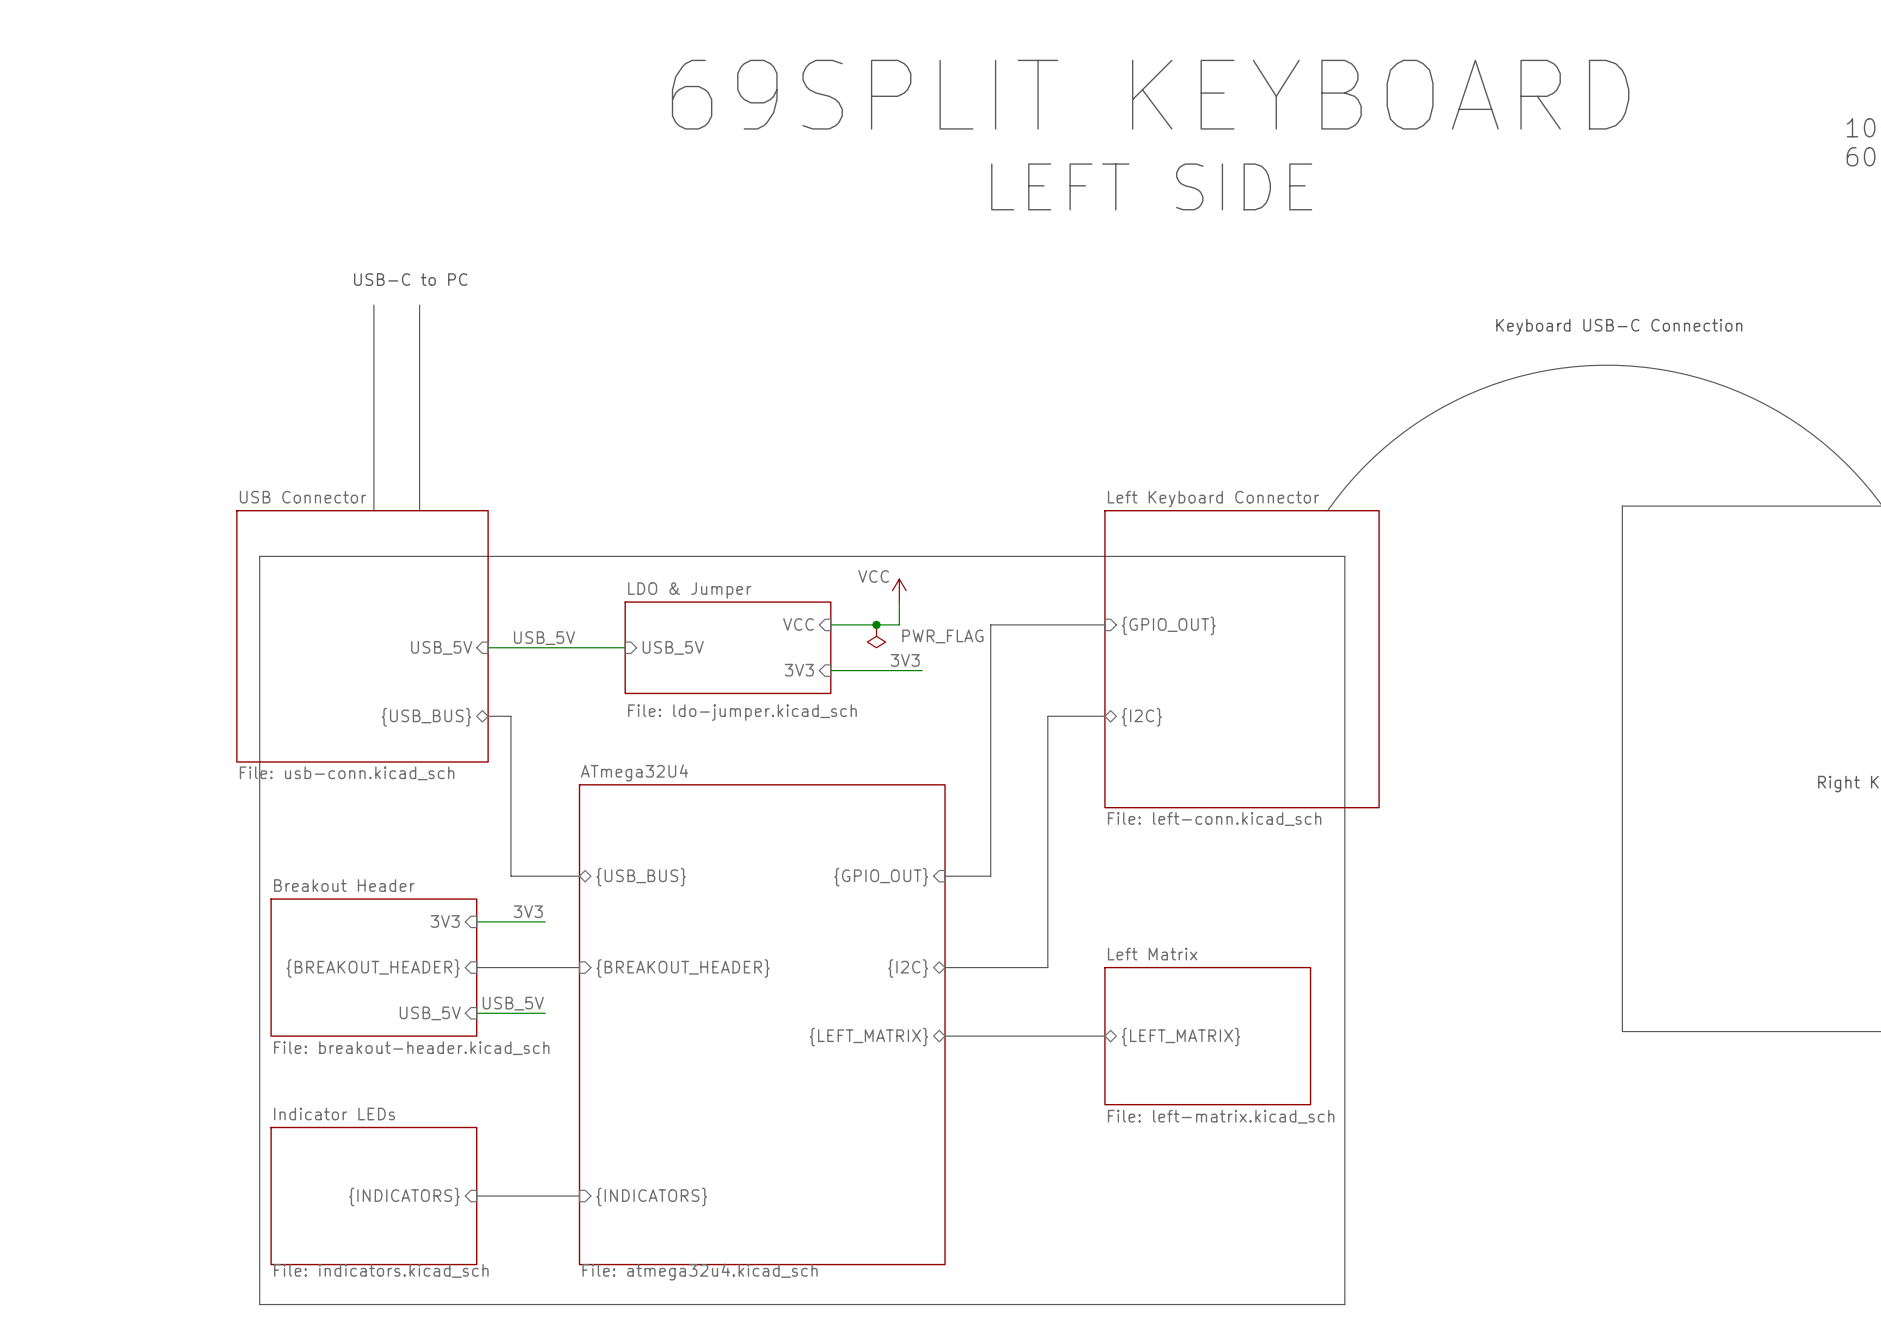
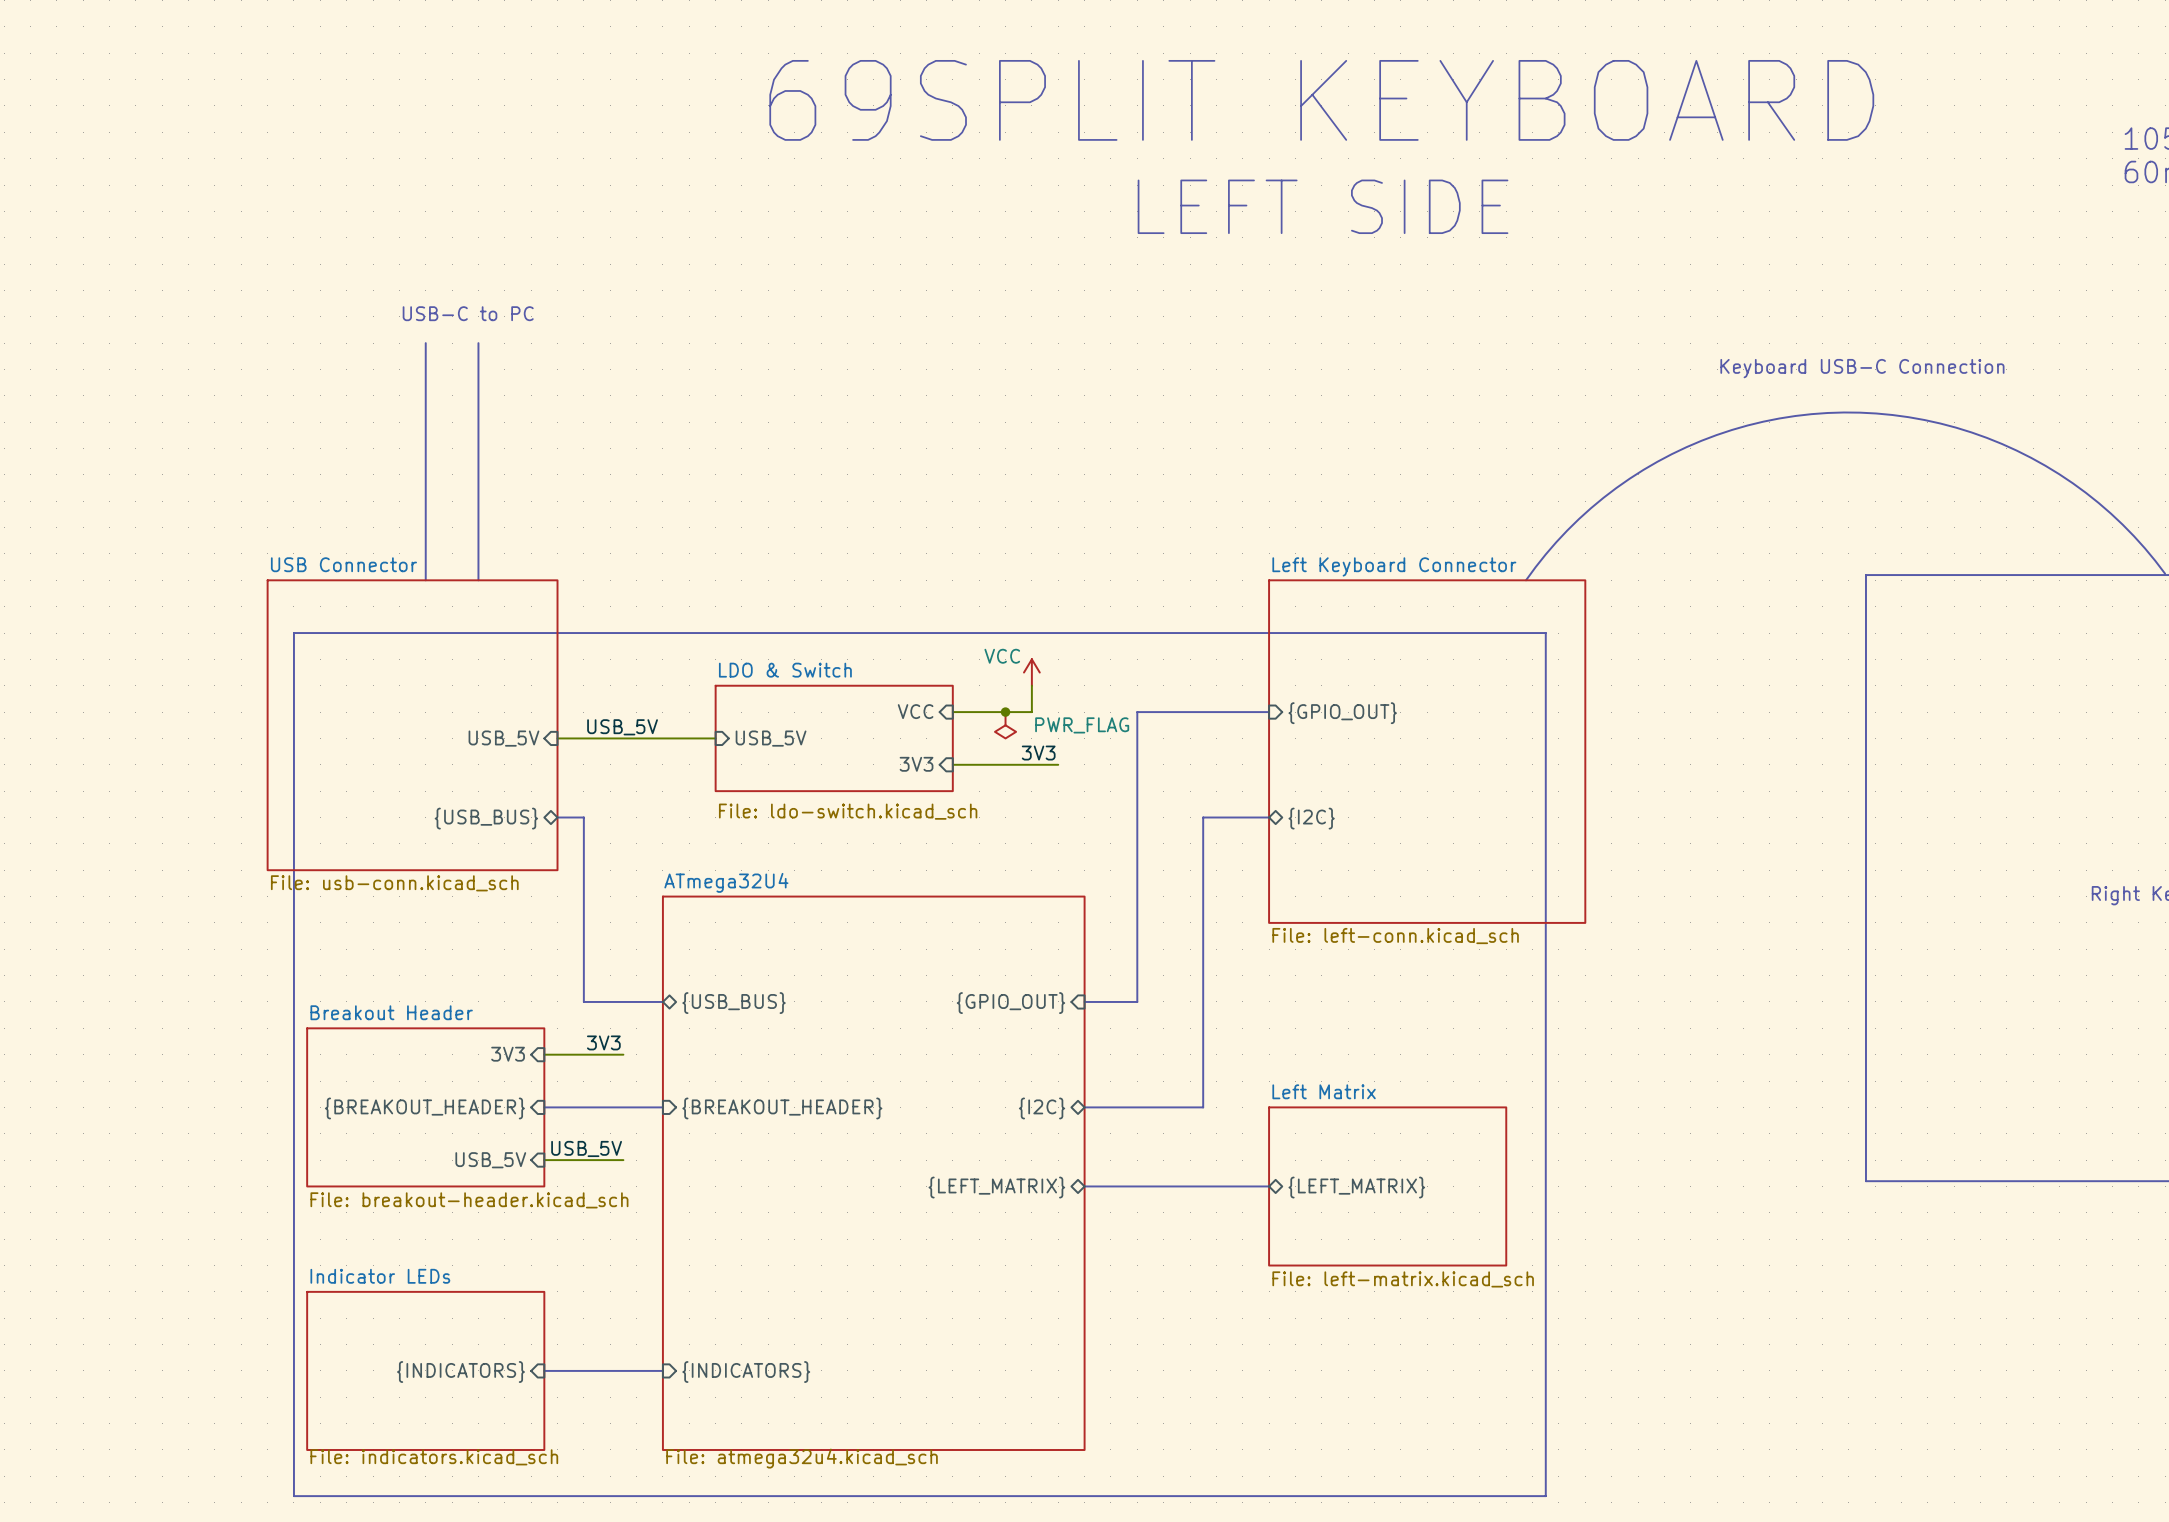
sheet LDO & Jumper name: LDO & Jumper (689, 590) -> LDO & Switch (785, 670)
sheet LDO & Jumper value: File: ldo-jumper.kicad_sch (742, 712) -> File: ldo-switch.kicad_sch (848, 811)

